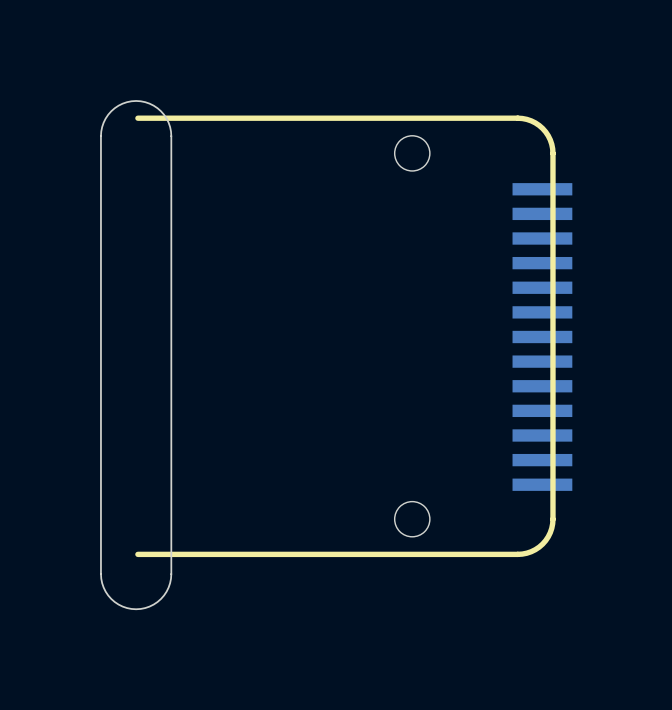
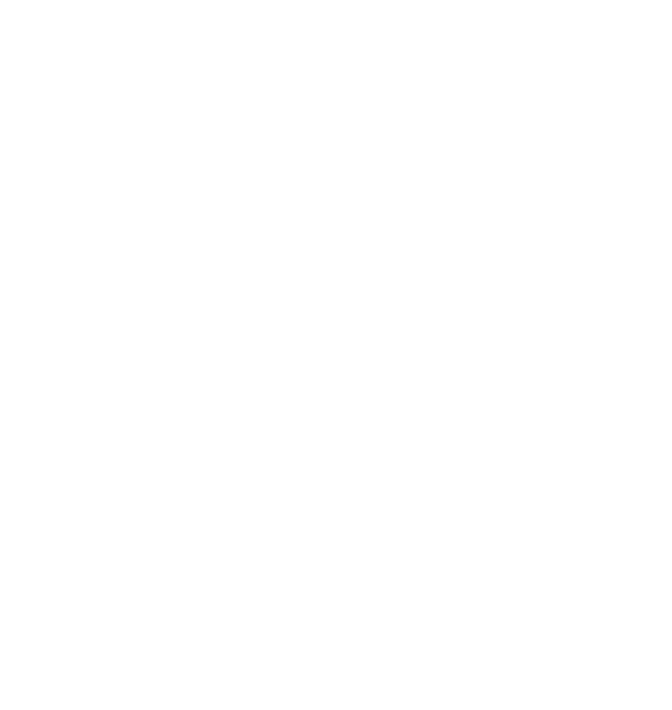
board edge: (171, 136) (171, 578) (166, 591) (157, 601) (145, 608) (131, 608) (118, 604) (108, 595) (102, 583) (100, 574) (101, 131) (105, 118) (111, 111) (122, 103) (136, 100) (149, 103) (161, 111) (168, 122) (171, 136) -> none
part: (353, 336) -> none

